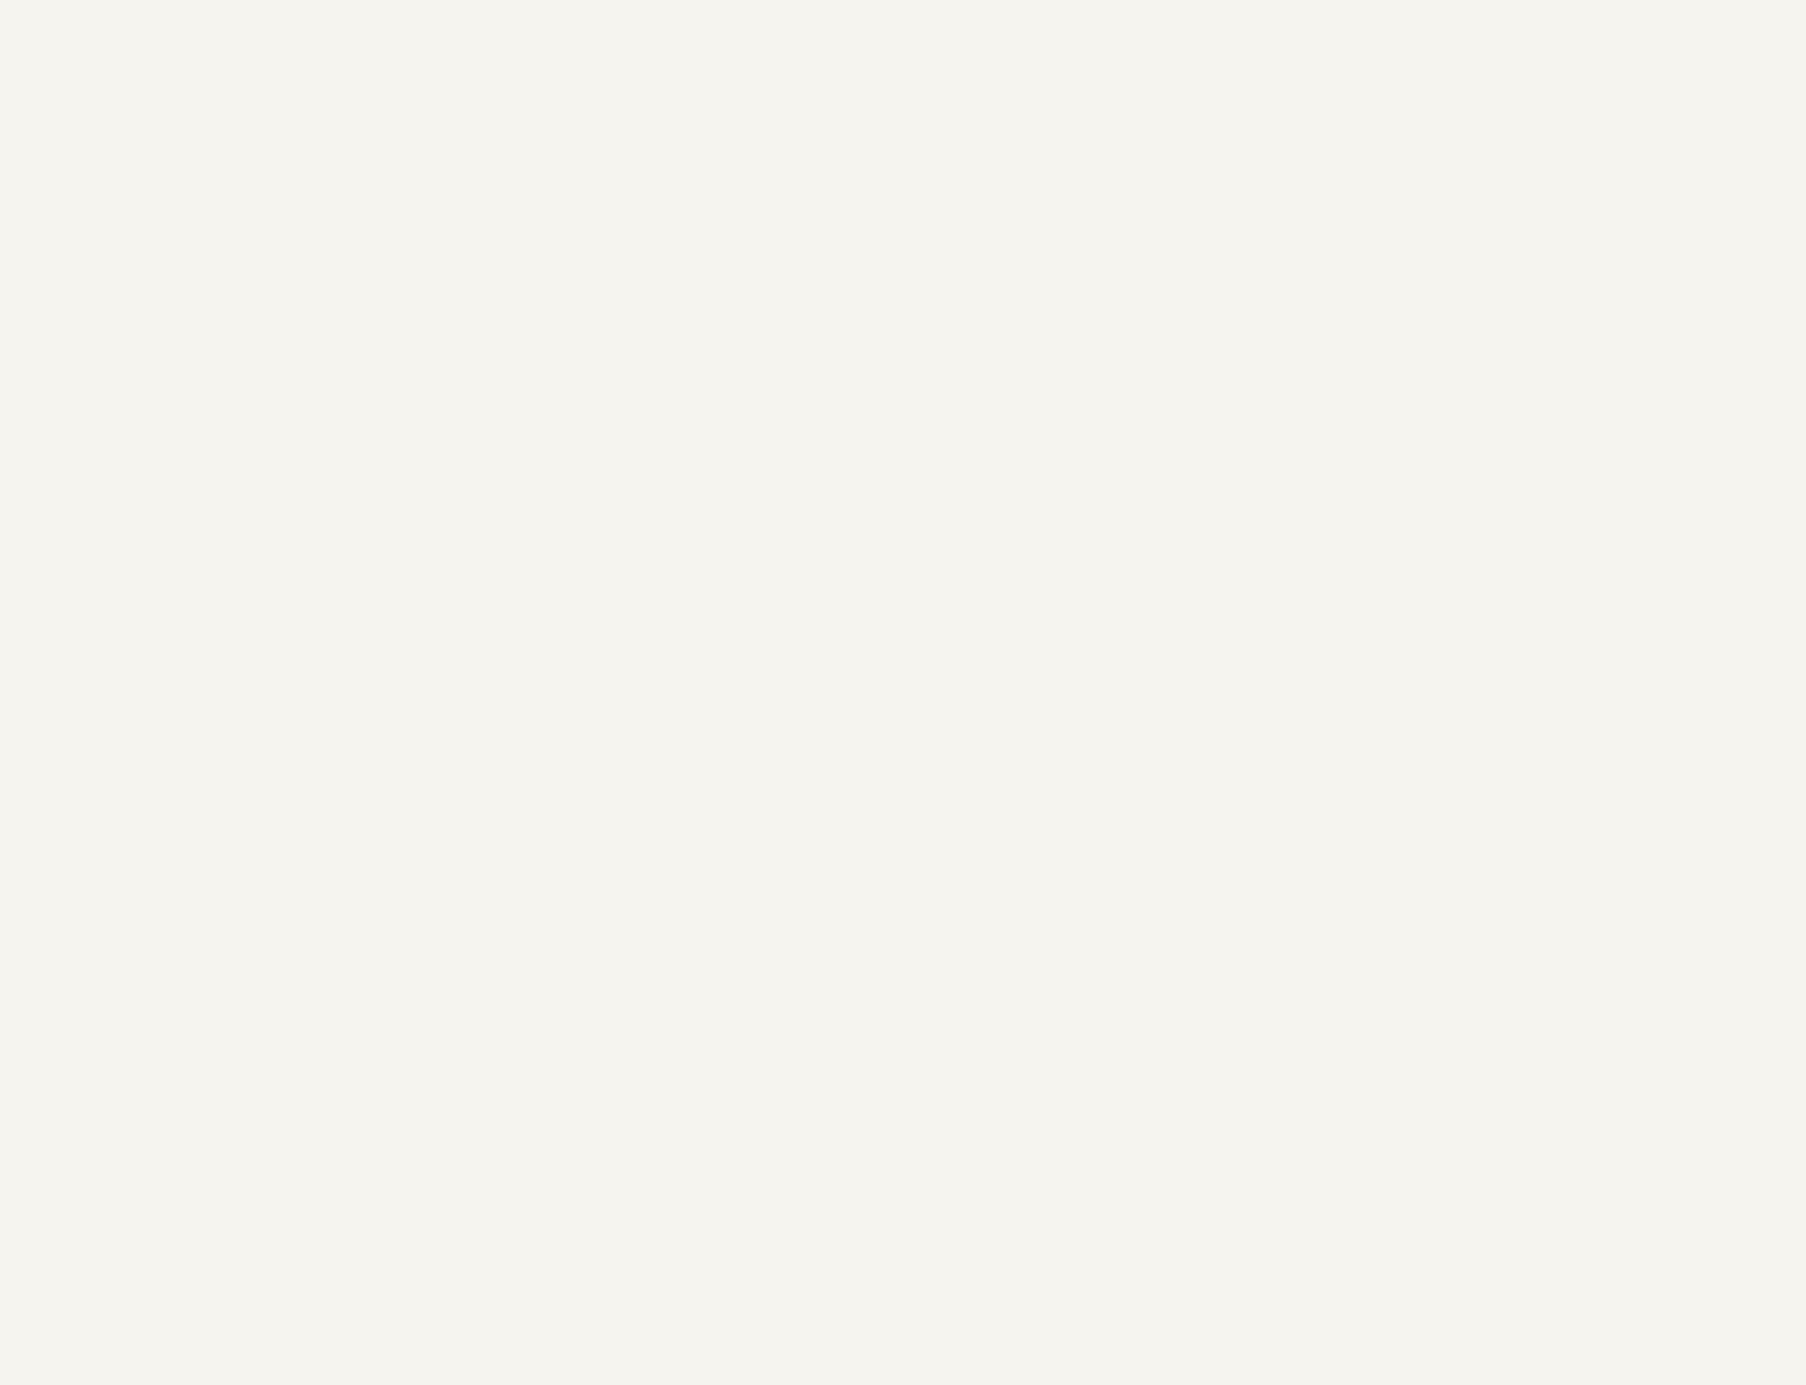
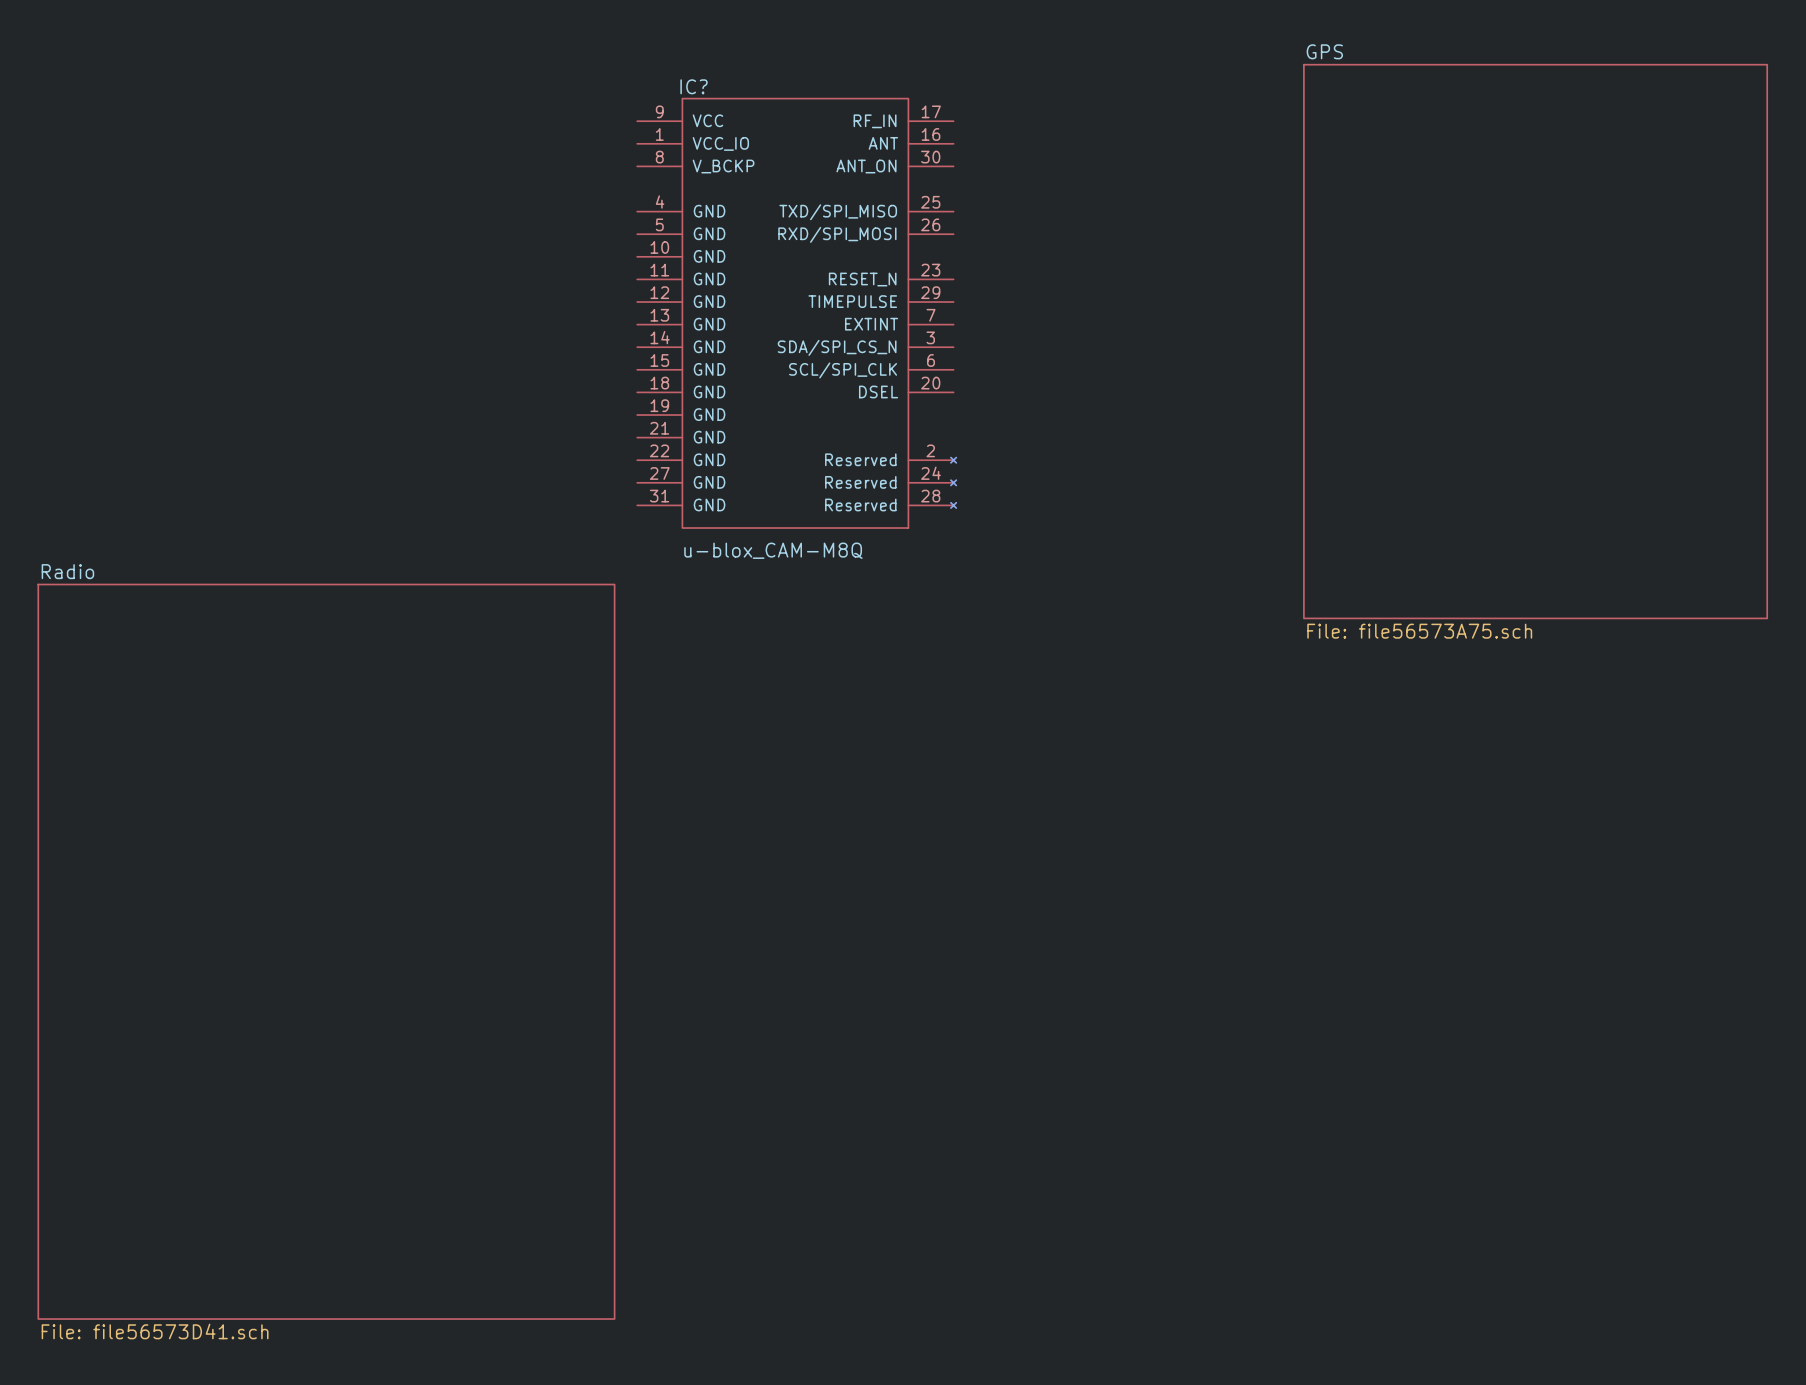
IC?: none -> u-blox_CAM-M8Q (796, 313)
sheet GPS: none -> File: file56573A75.sch (1535, 341)
sheet Radio: none -> File: file56573D41.sch (326, 951)

